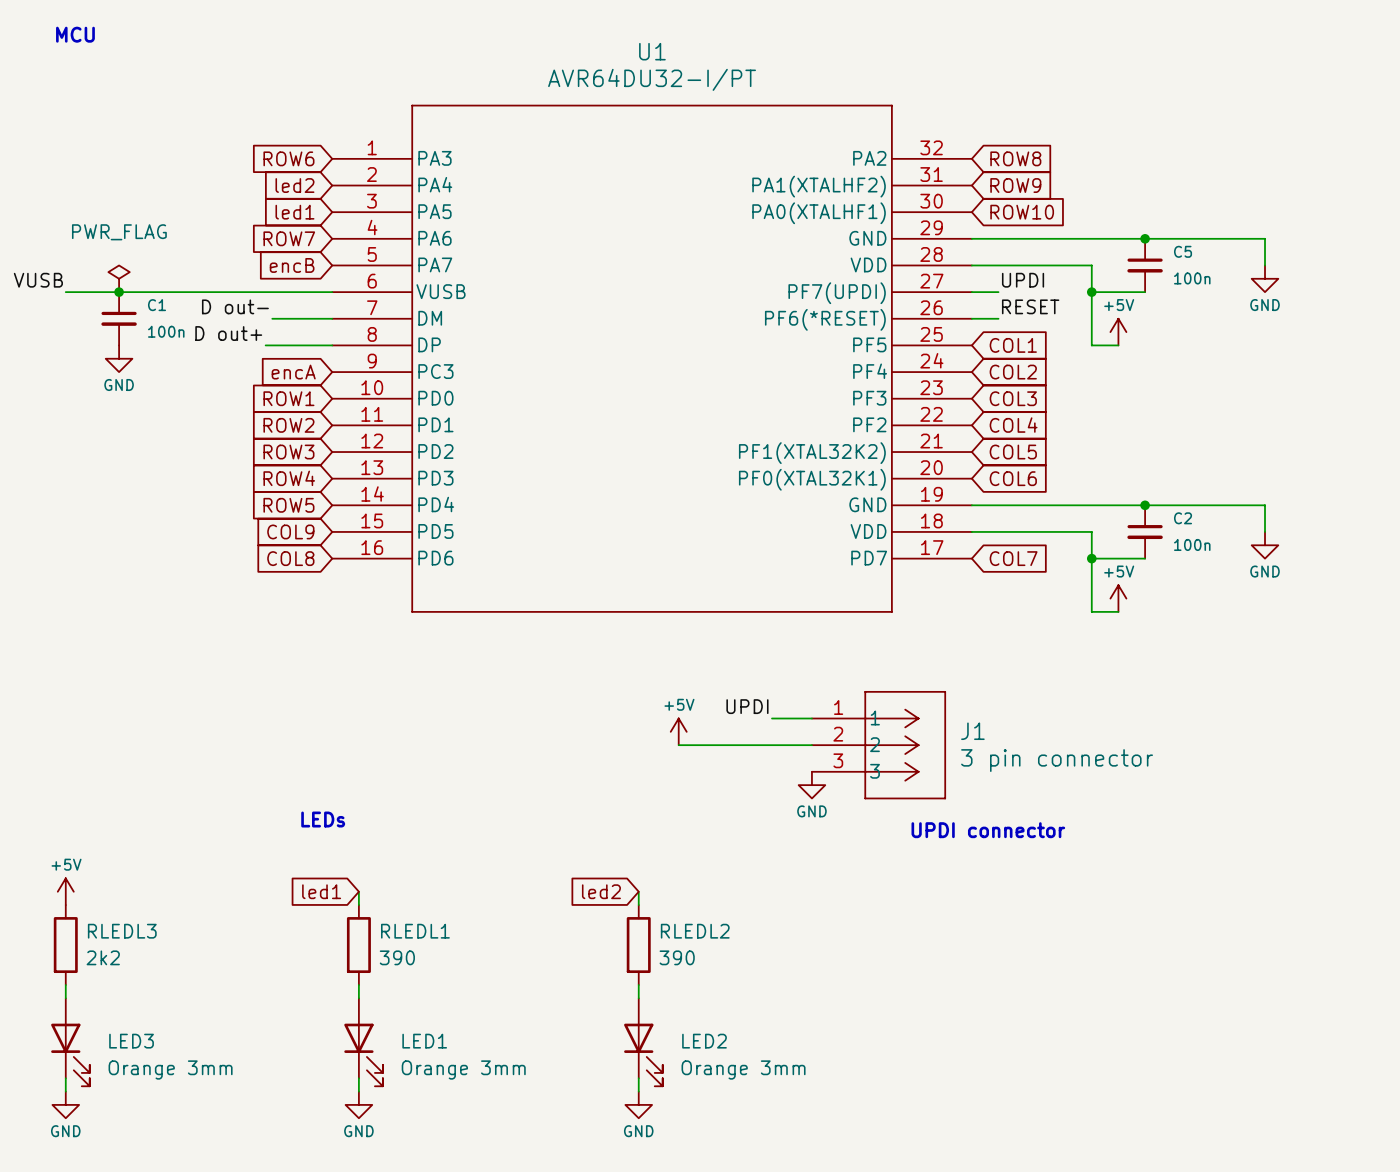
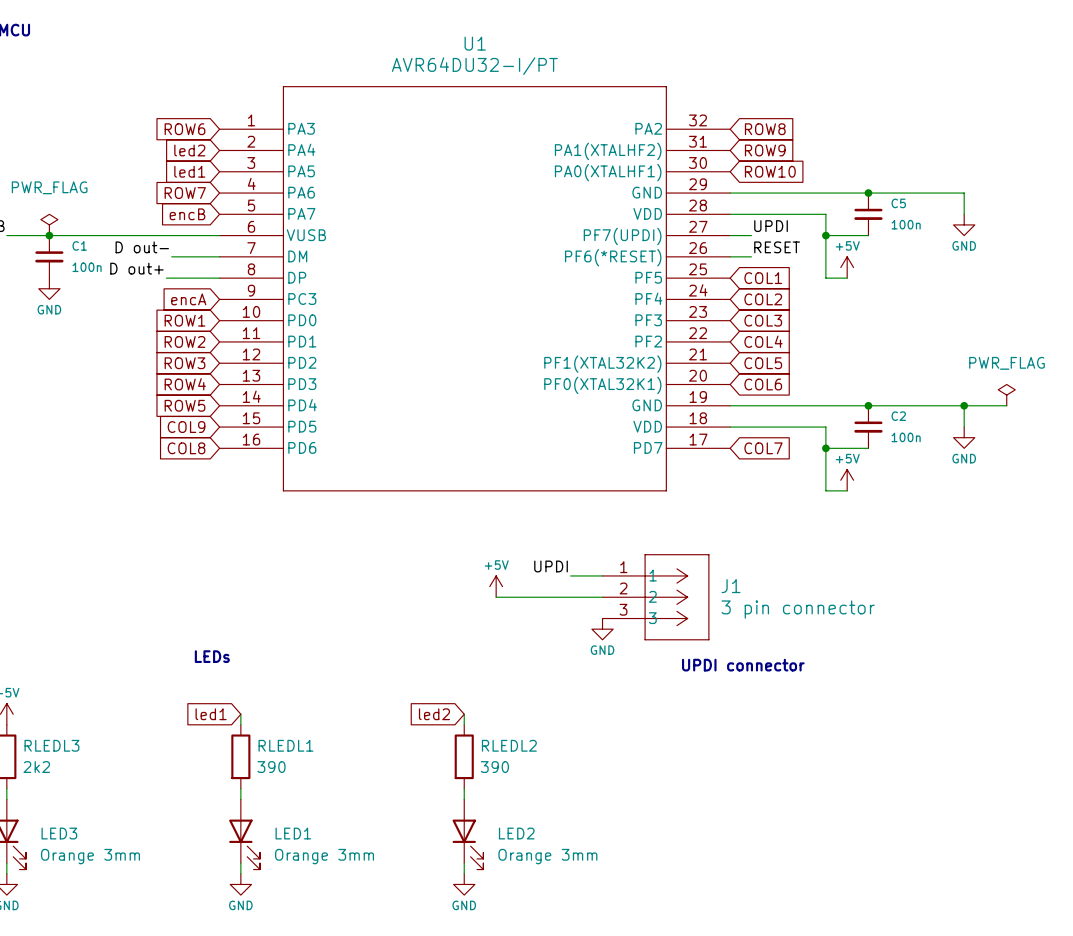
power symbol: none -> PWR_FLAG (1006, 395)
wire: none -> (964, 405) (1006, 405)
junction: none -> (964, 405)

